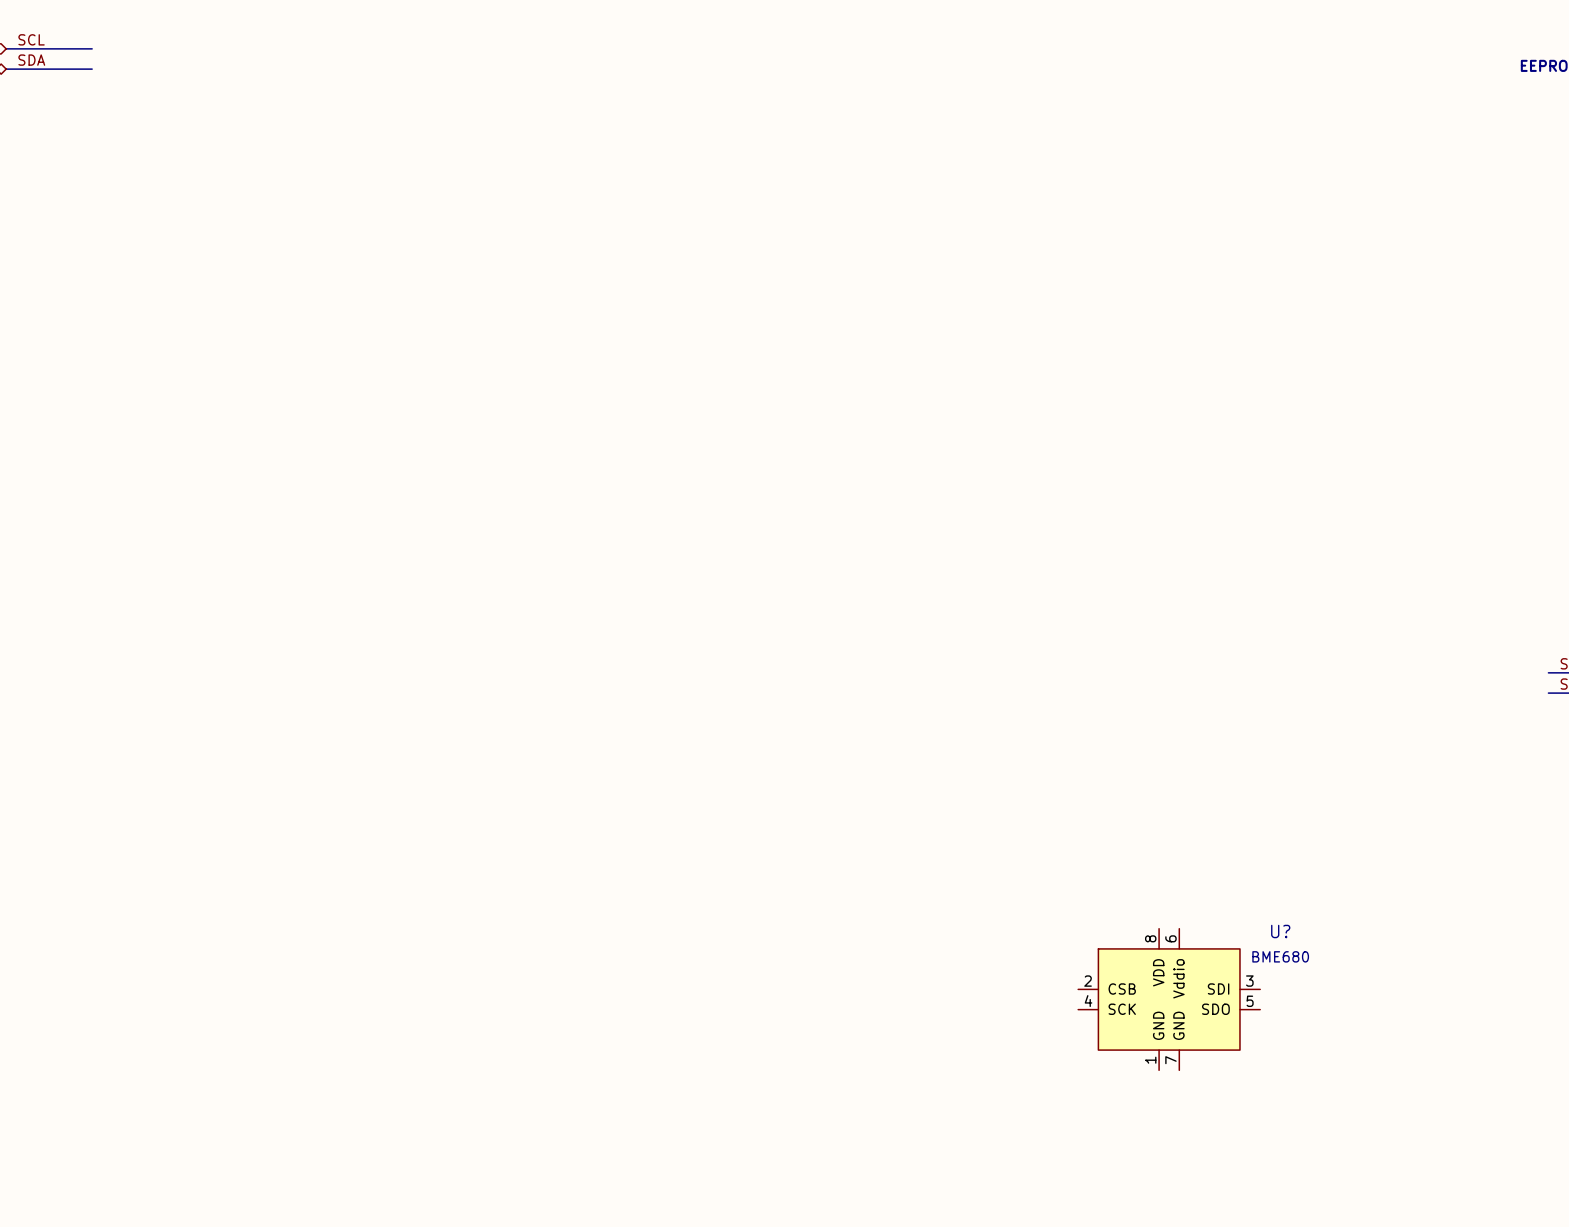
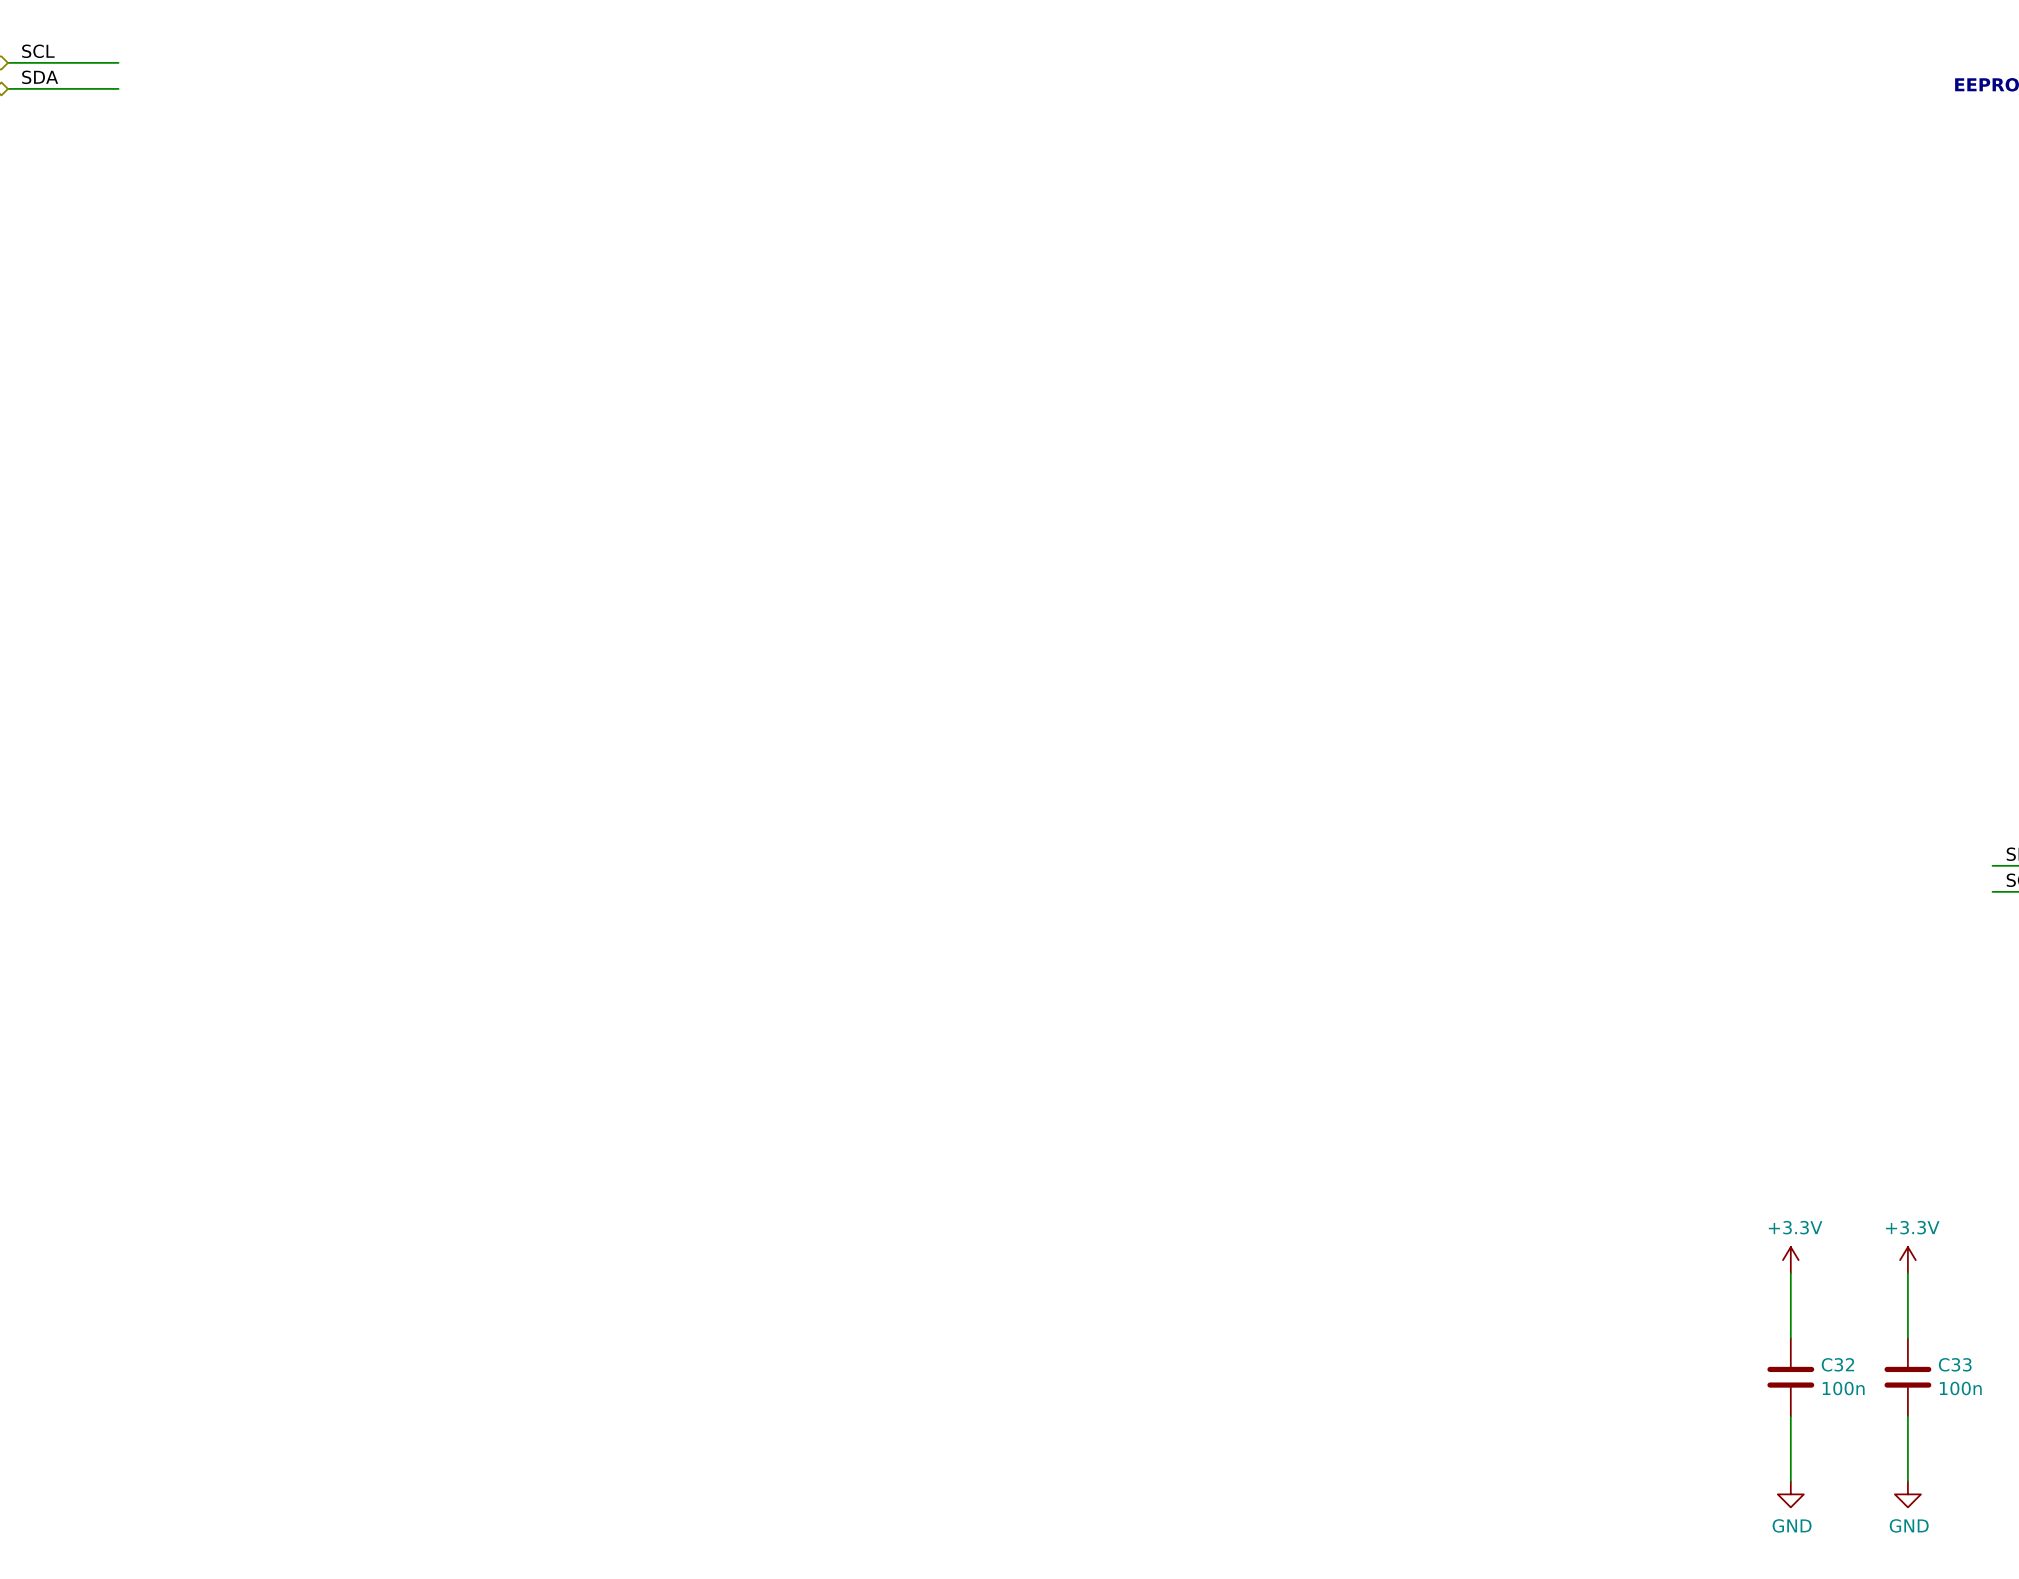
power symbol: none -> +3.3V (1790, 1260)
power symbol: none -> +3.3V (1907, 1260)
wire: none -> (1790, 1273) (1790, 1338)
wire: none -> (1907, 1273) (1907, 1338)
U?: BME680 (1169, 999) -> none
C32: none -> 100n (1790, 1377)
C33: none -> 100n (1907, 1377)
wire: none -> (1790, 1416) (1790, 1481)
wire: none -> (1907, 1416) (1907, 1481)
power symbol: none -> GND (1790, 1494)
power symbol: none -> GND (1907, 1494)

